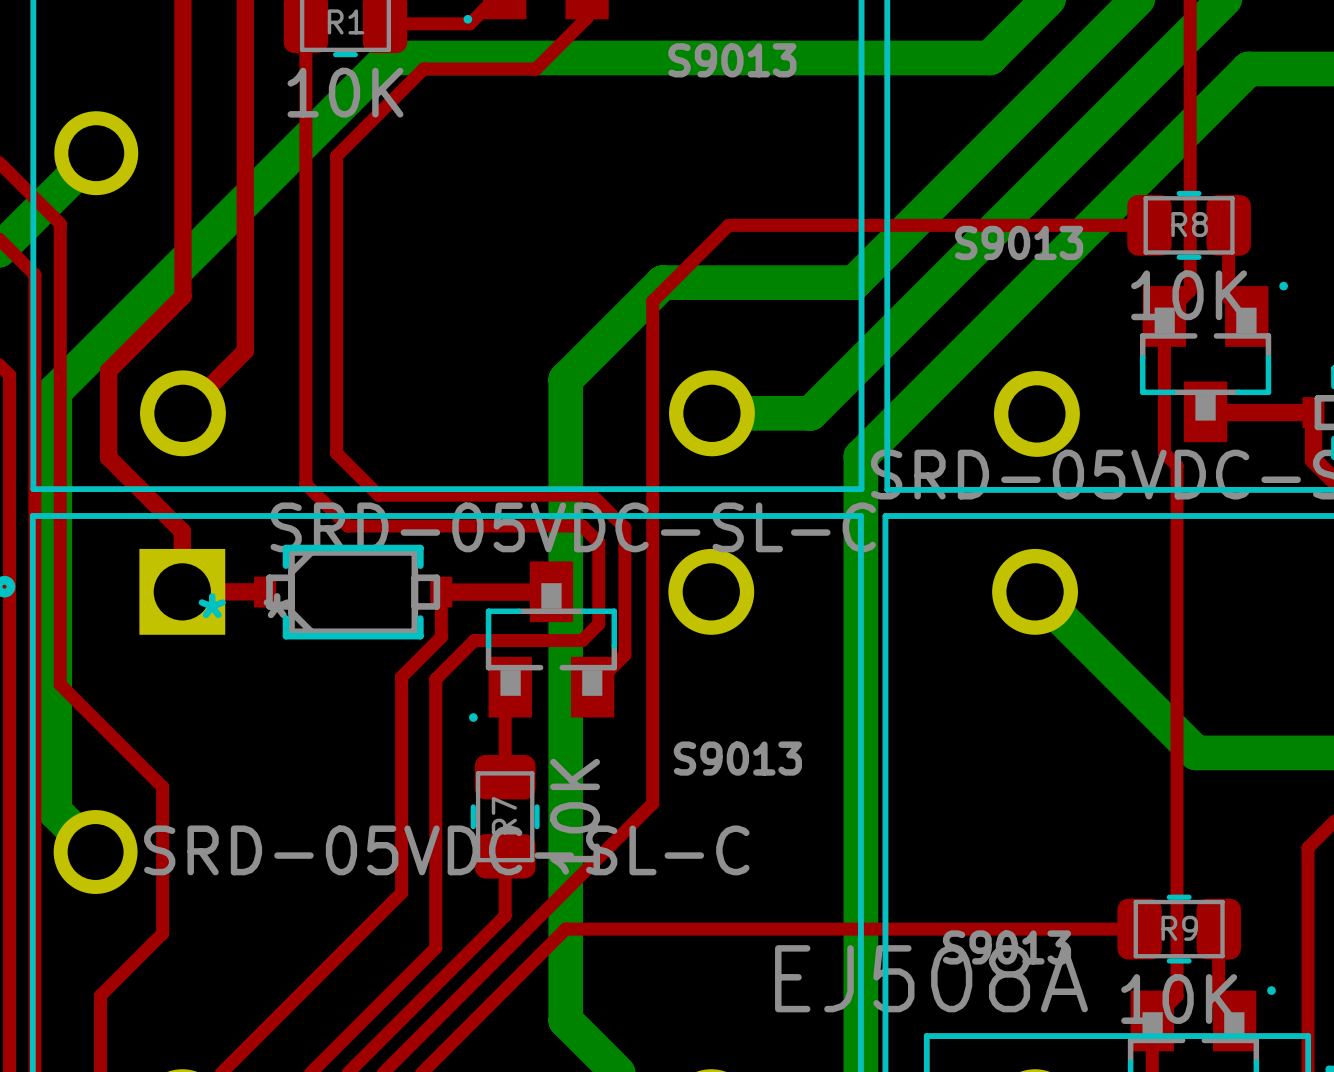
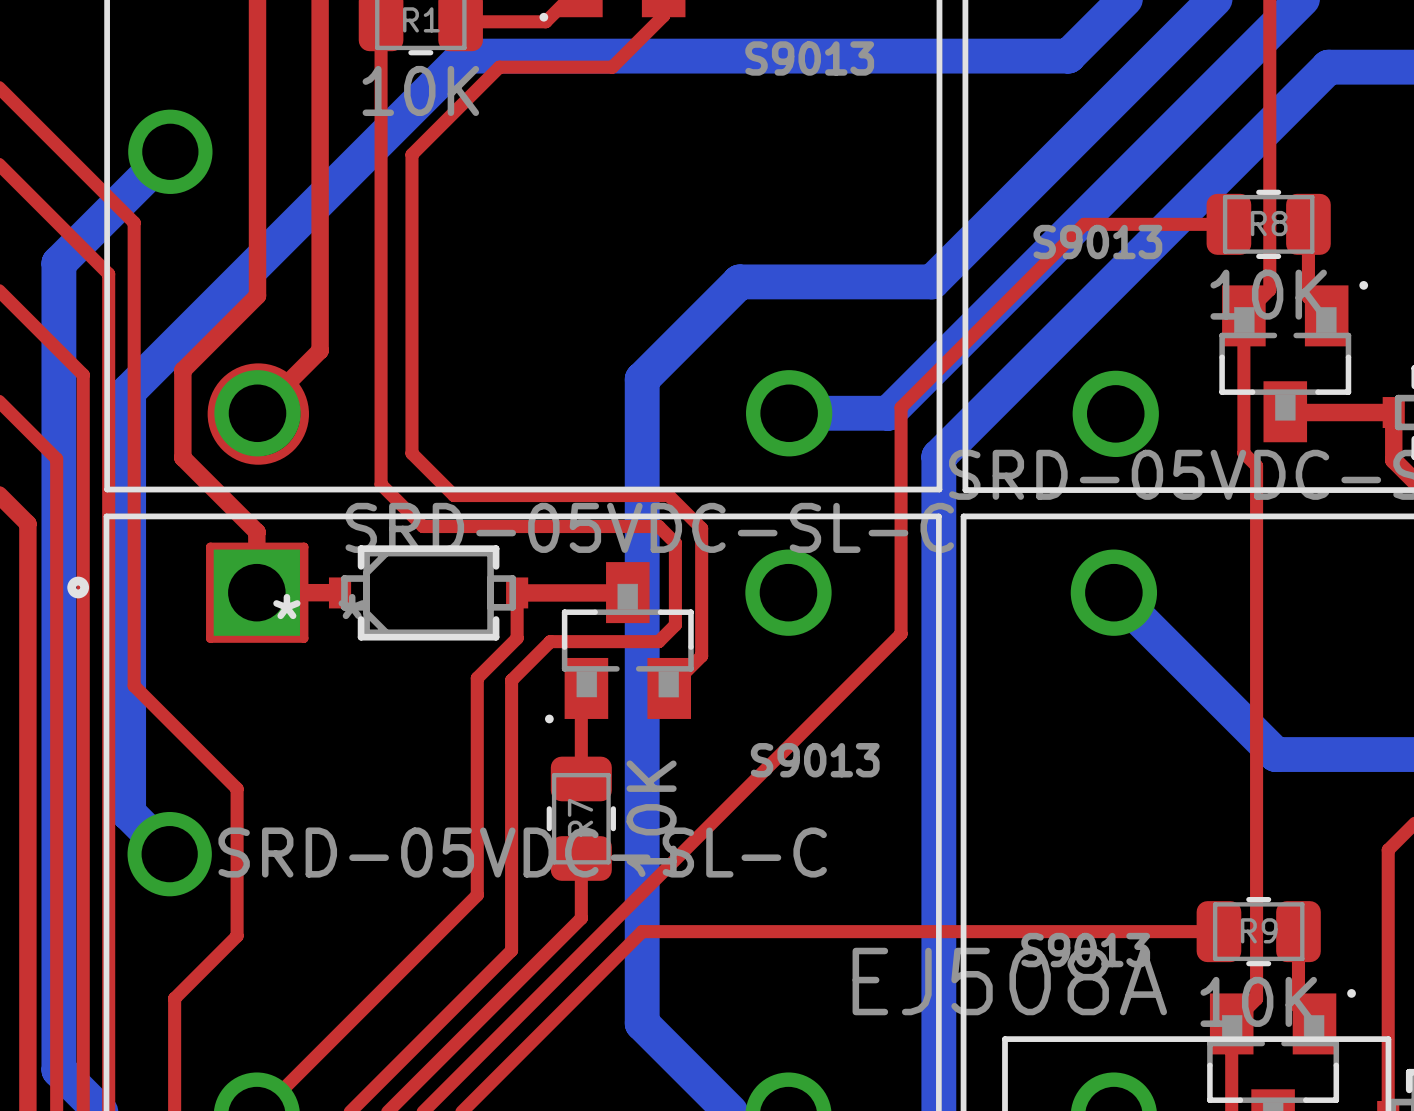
top track: (1005, 225) (728, 225) (652, 301) (652, 803) -> (1084, 224) (901, 407) (901, 634) (729, 805)
drawing: none -> [207, 363, 310, 465]
top track: none -> (210, 546) (304, 546) (304, 638) (210, 638) (210, 546)

